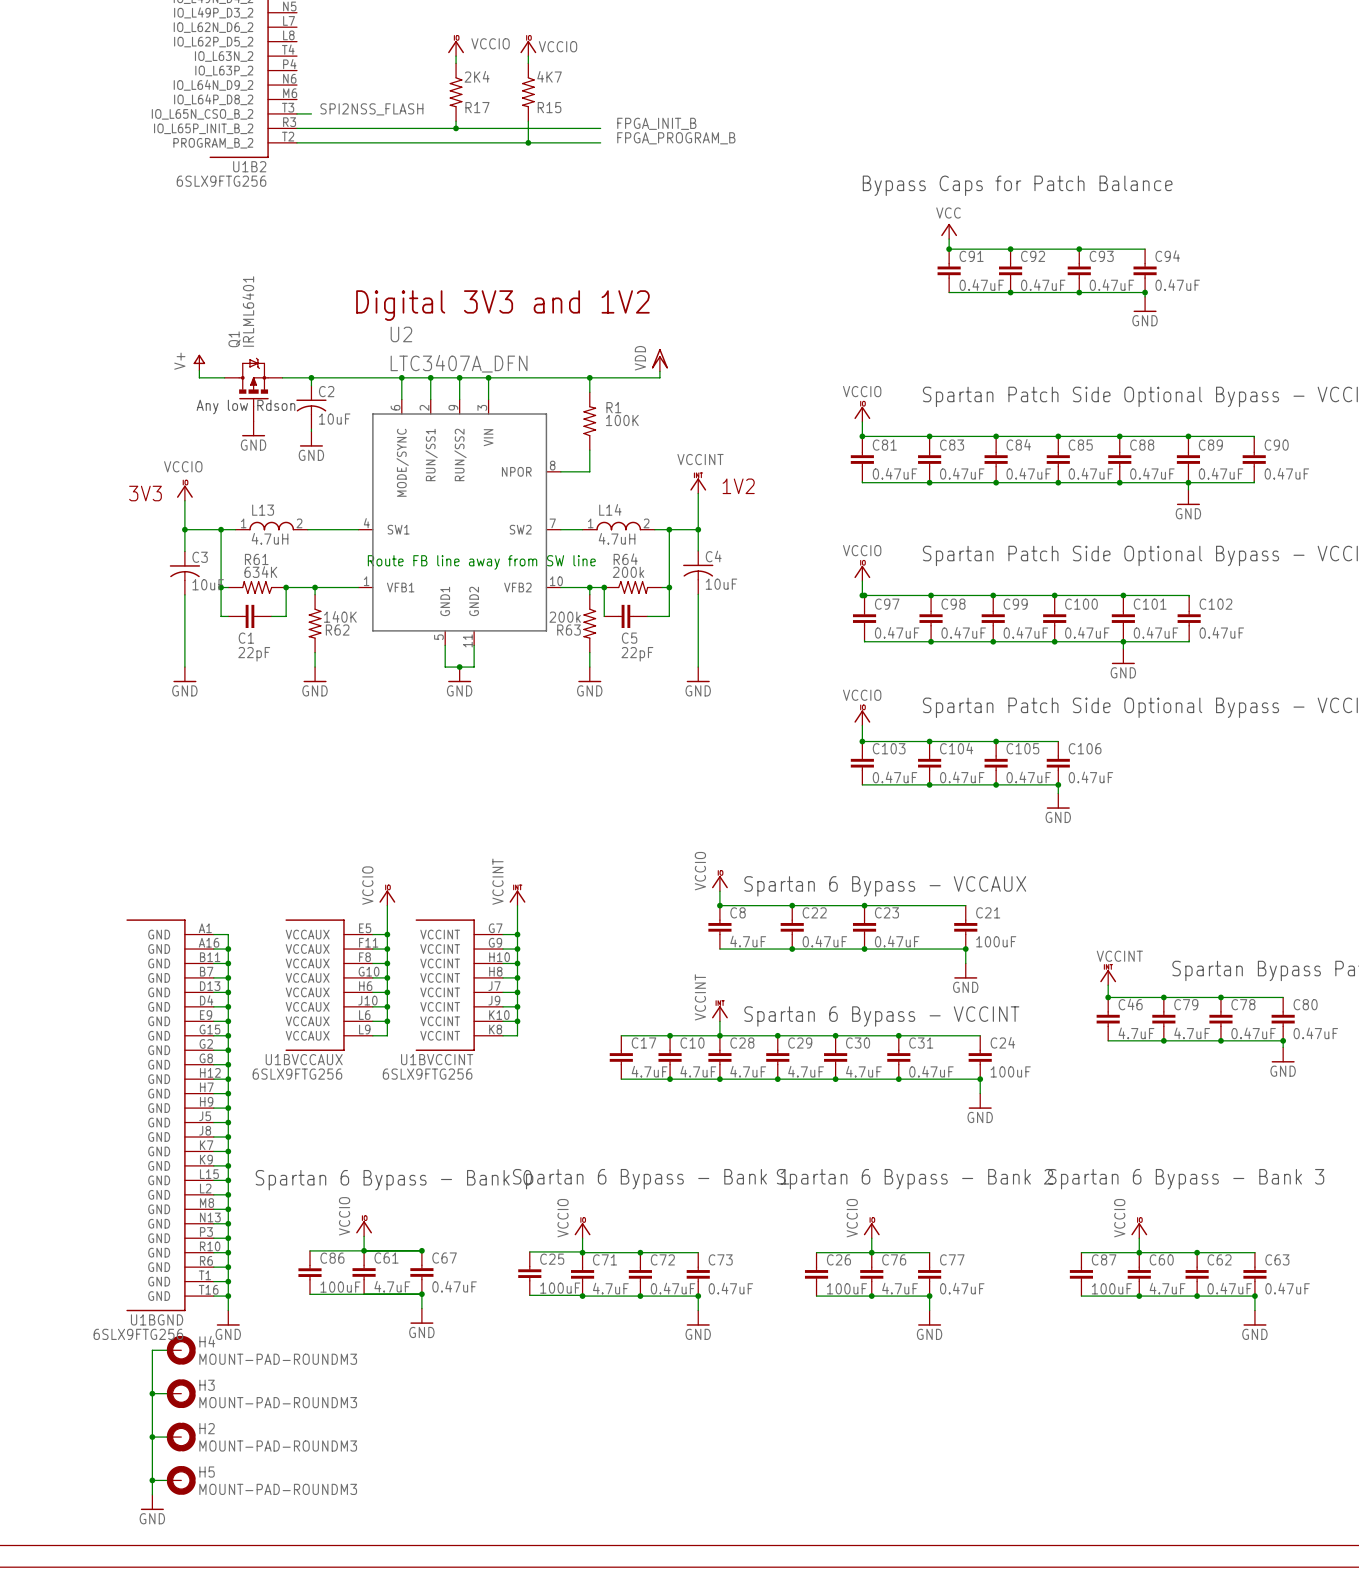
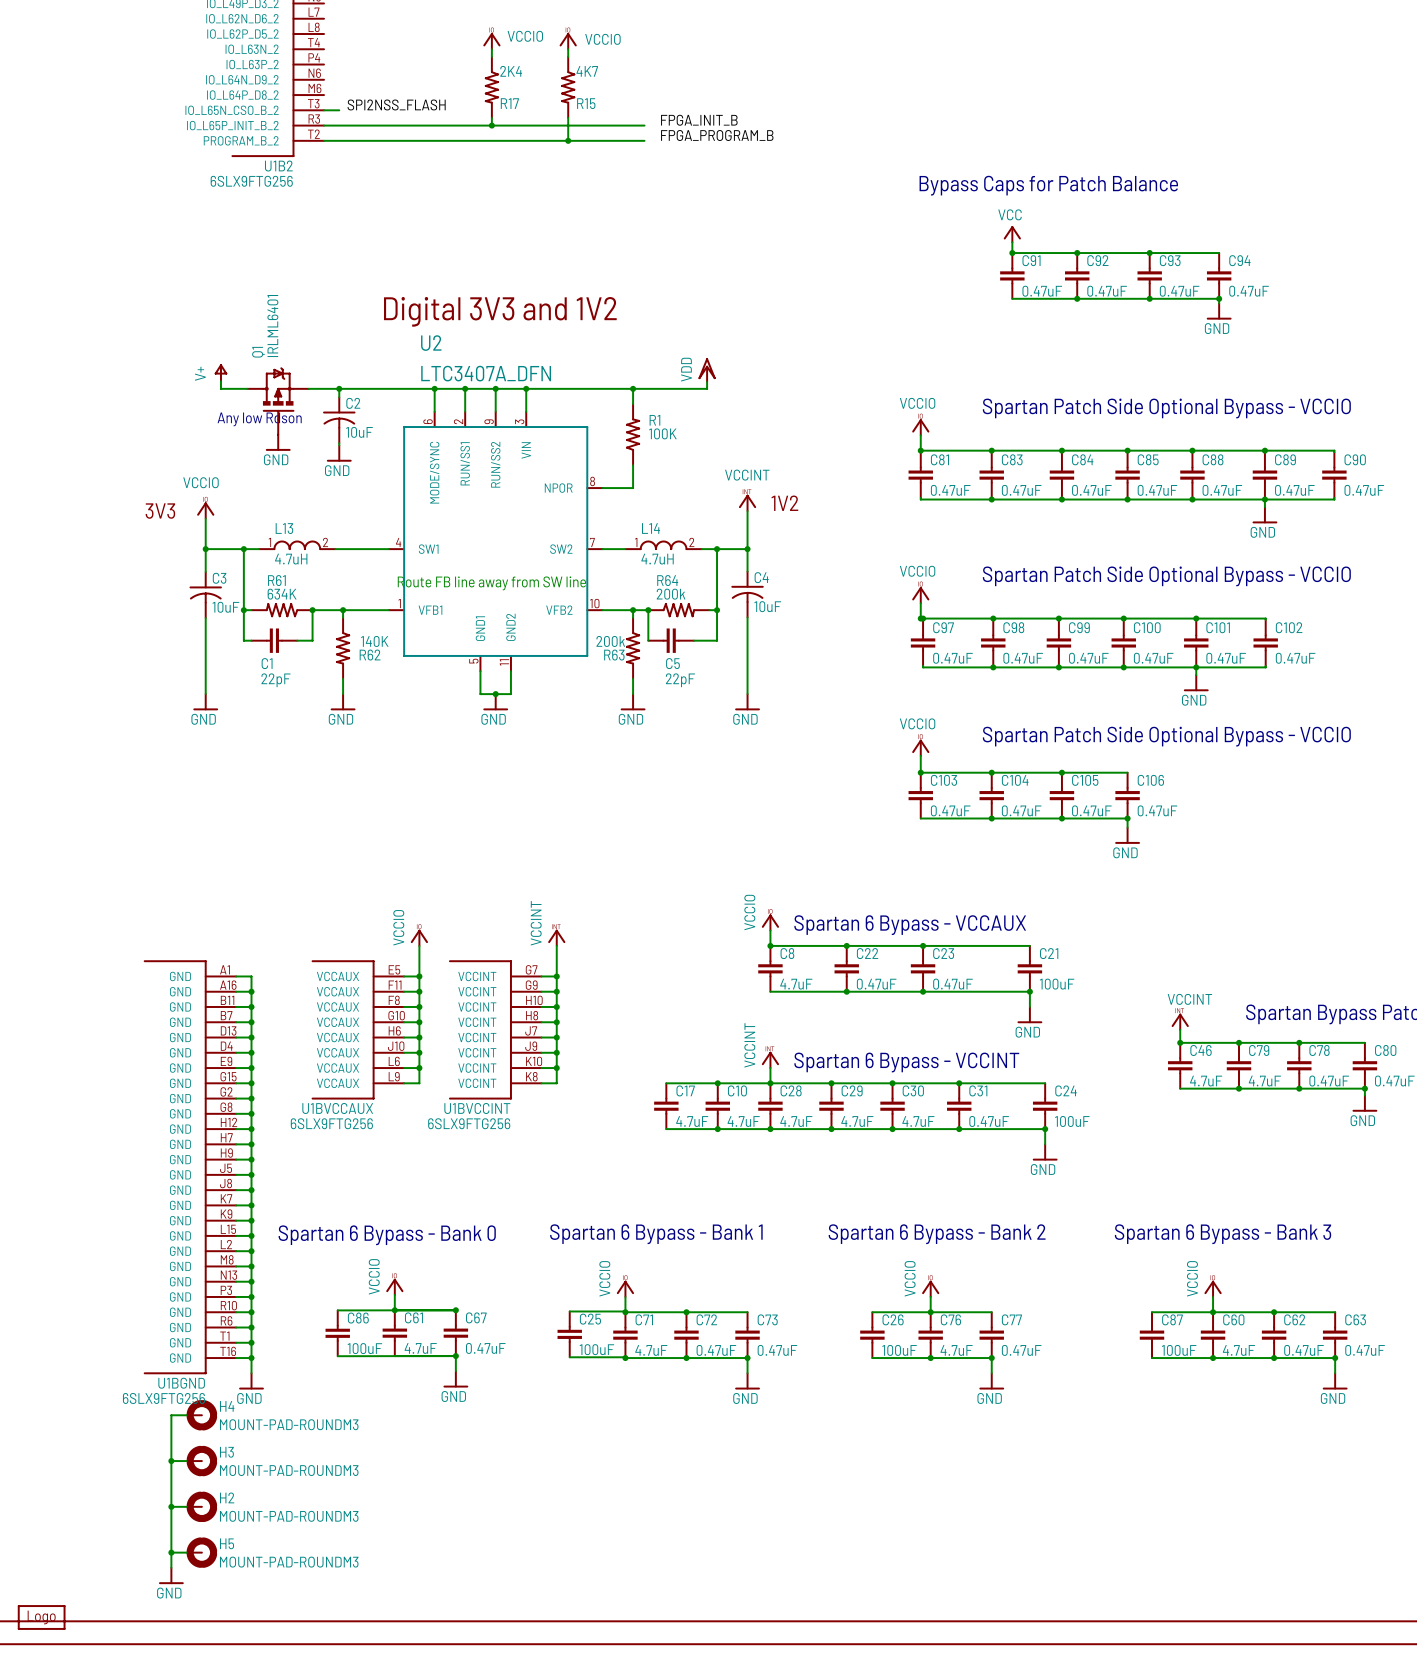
part: none -> (41, 1617)

